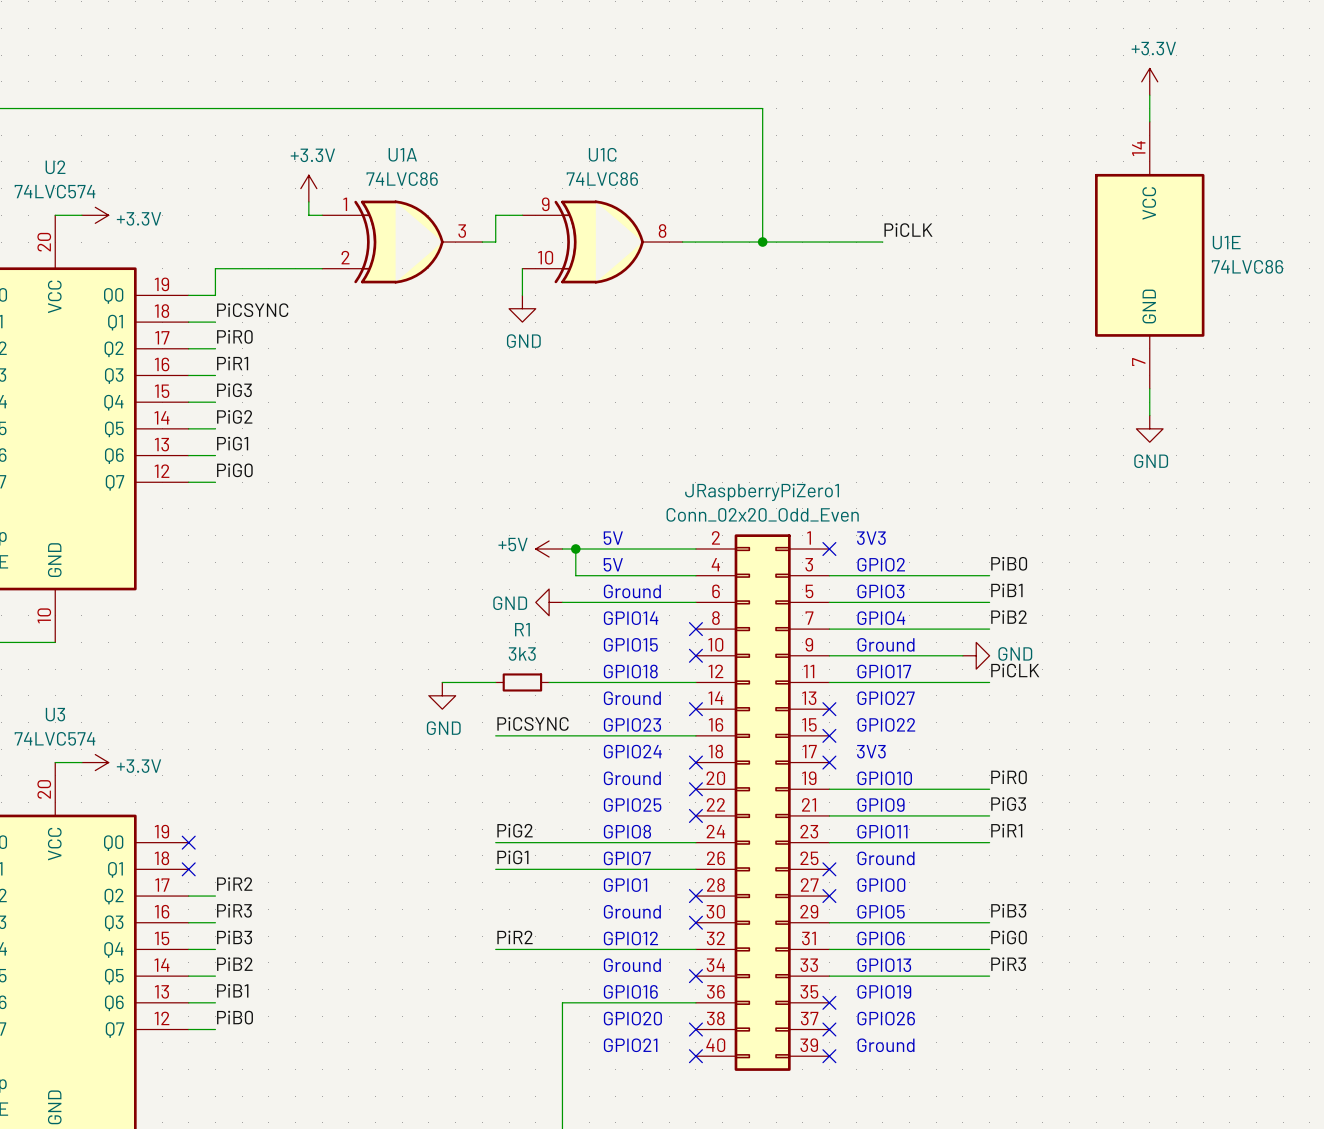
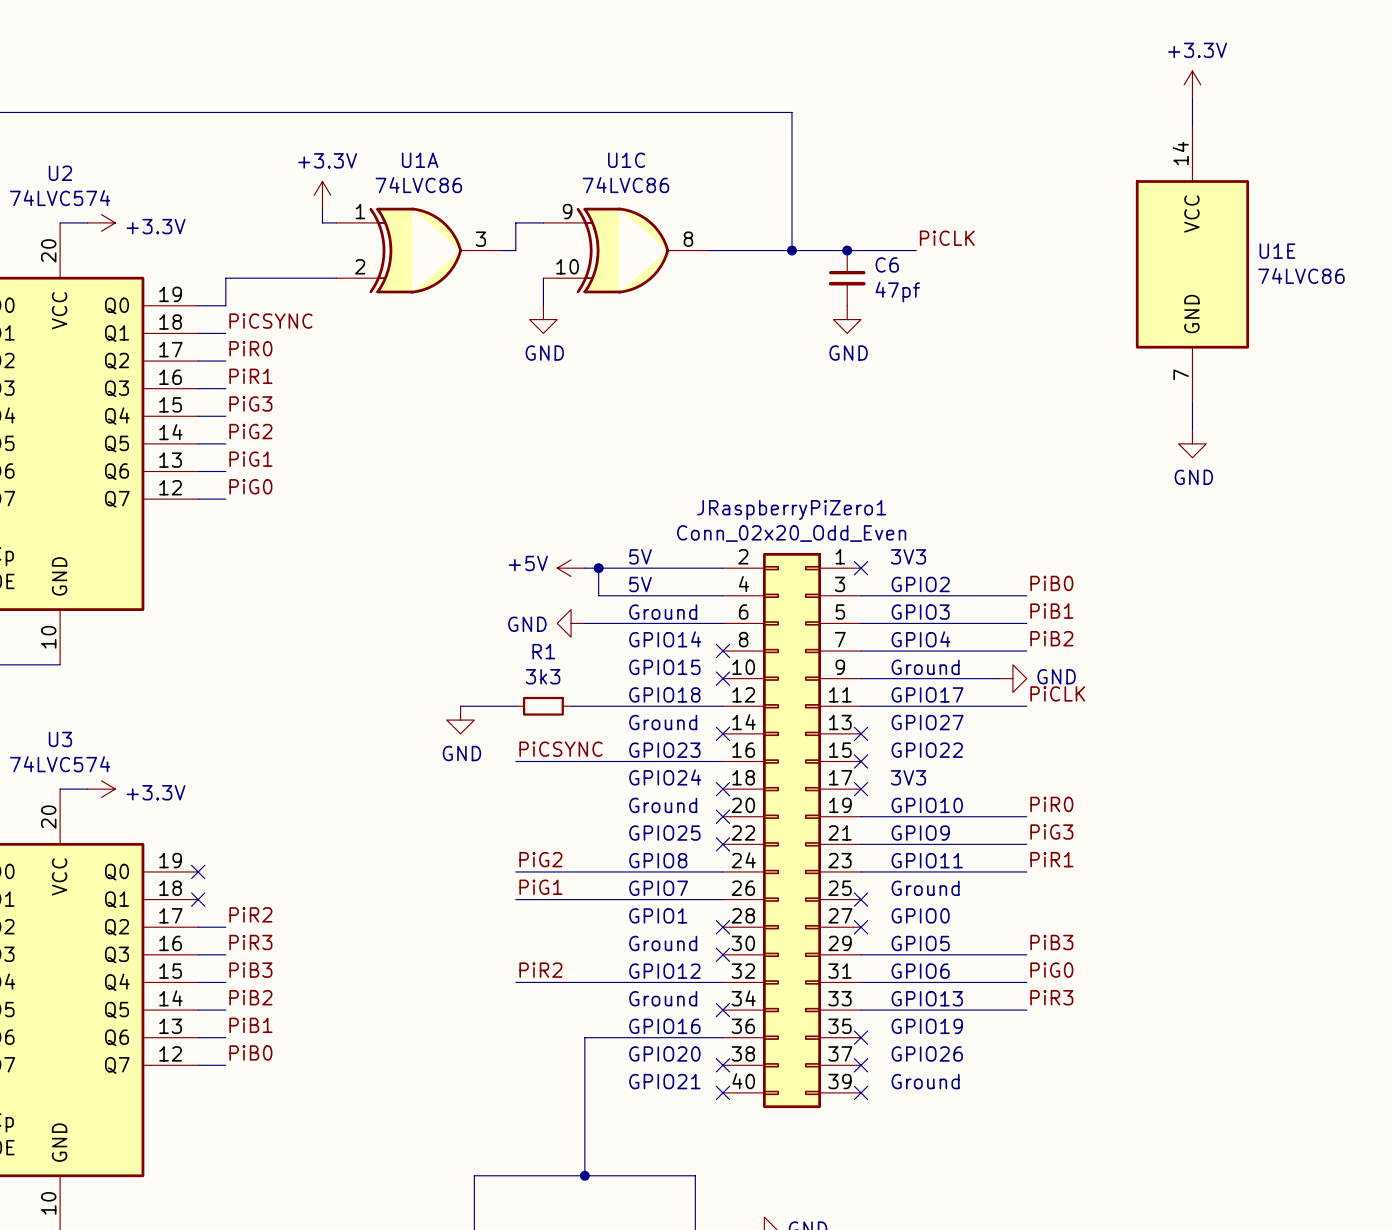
junction: none -> (847, 250)
C6: none -> 47pf (847, 278)
power symbol: none -> GND (847, 319)

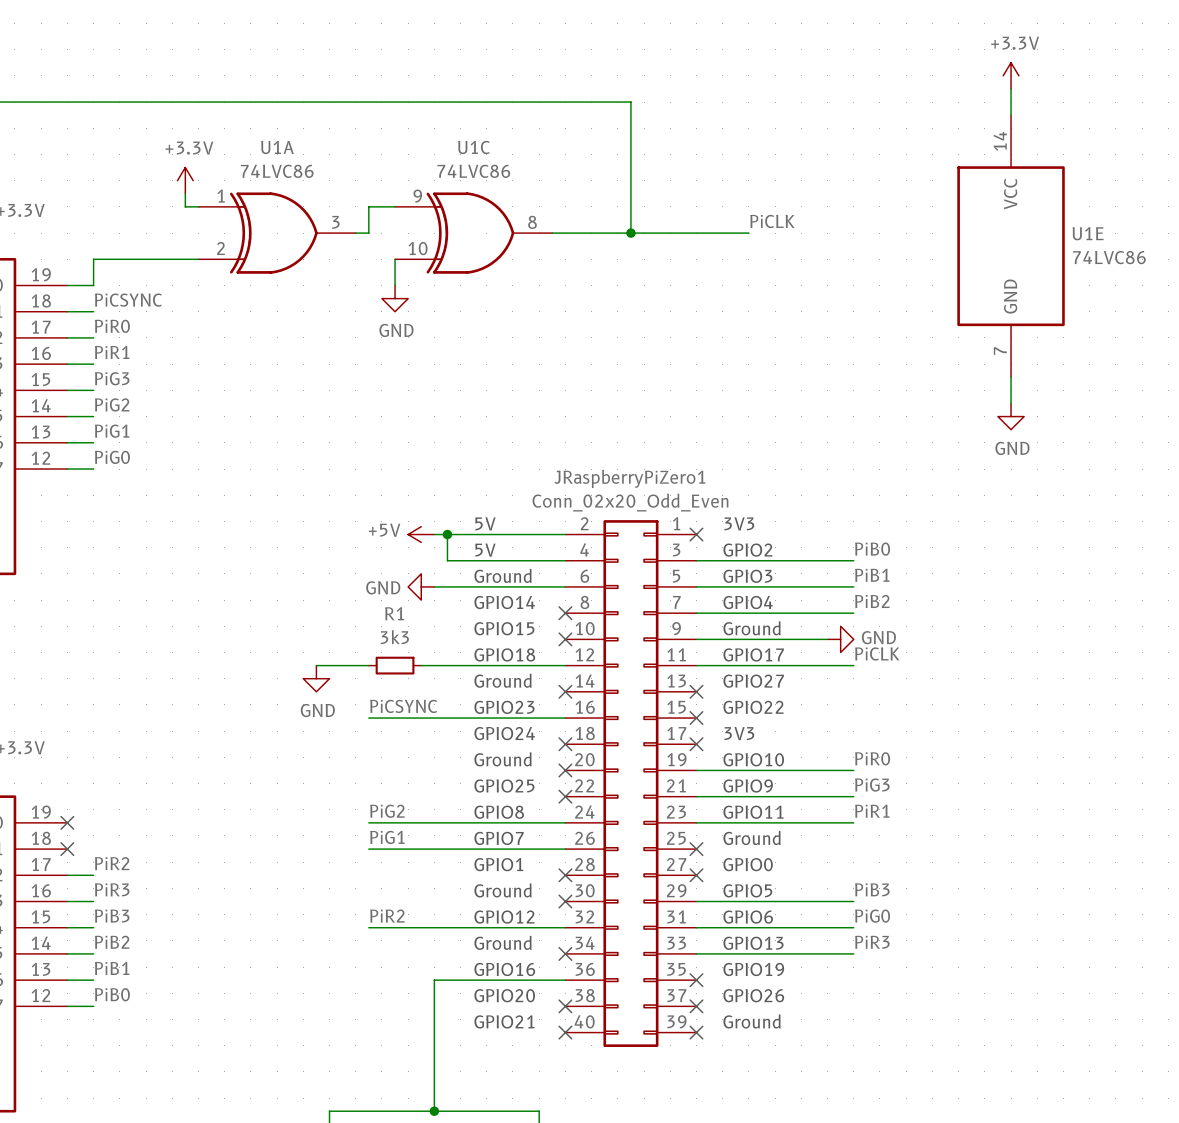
junction: (847, 250) -> none
C6: 47pf (847, 278) -> none
power symbol: GND (847, 319) -> none

